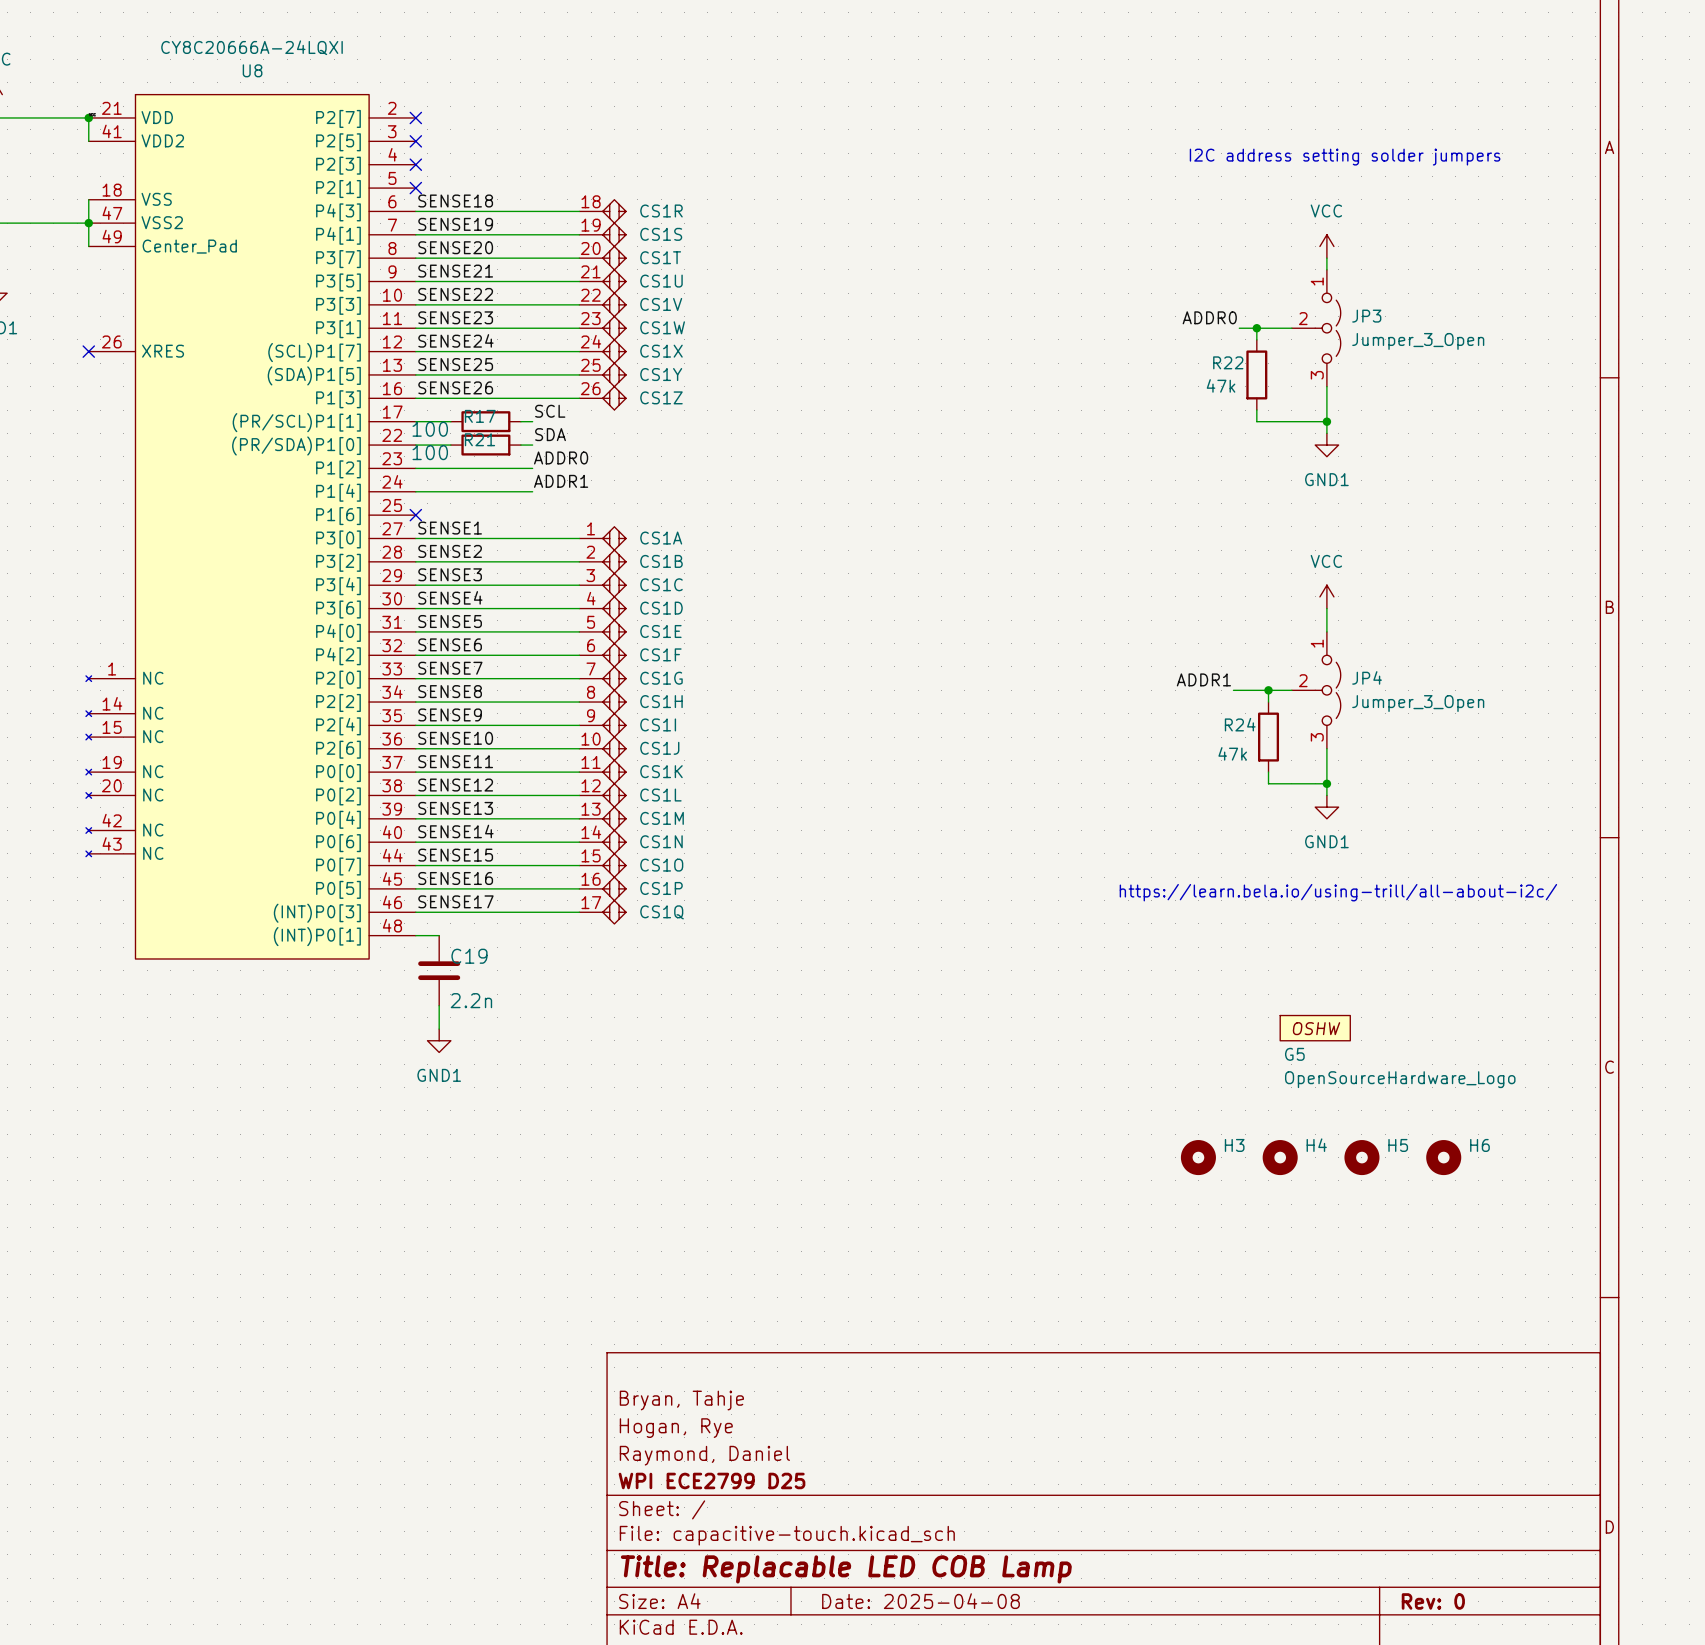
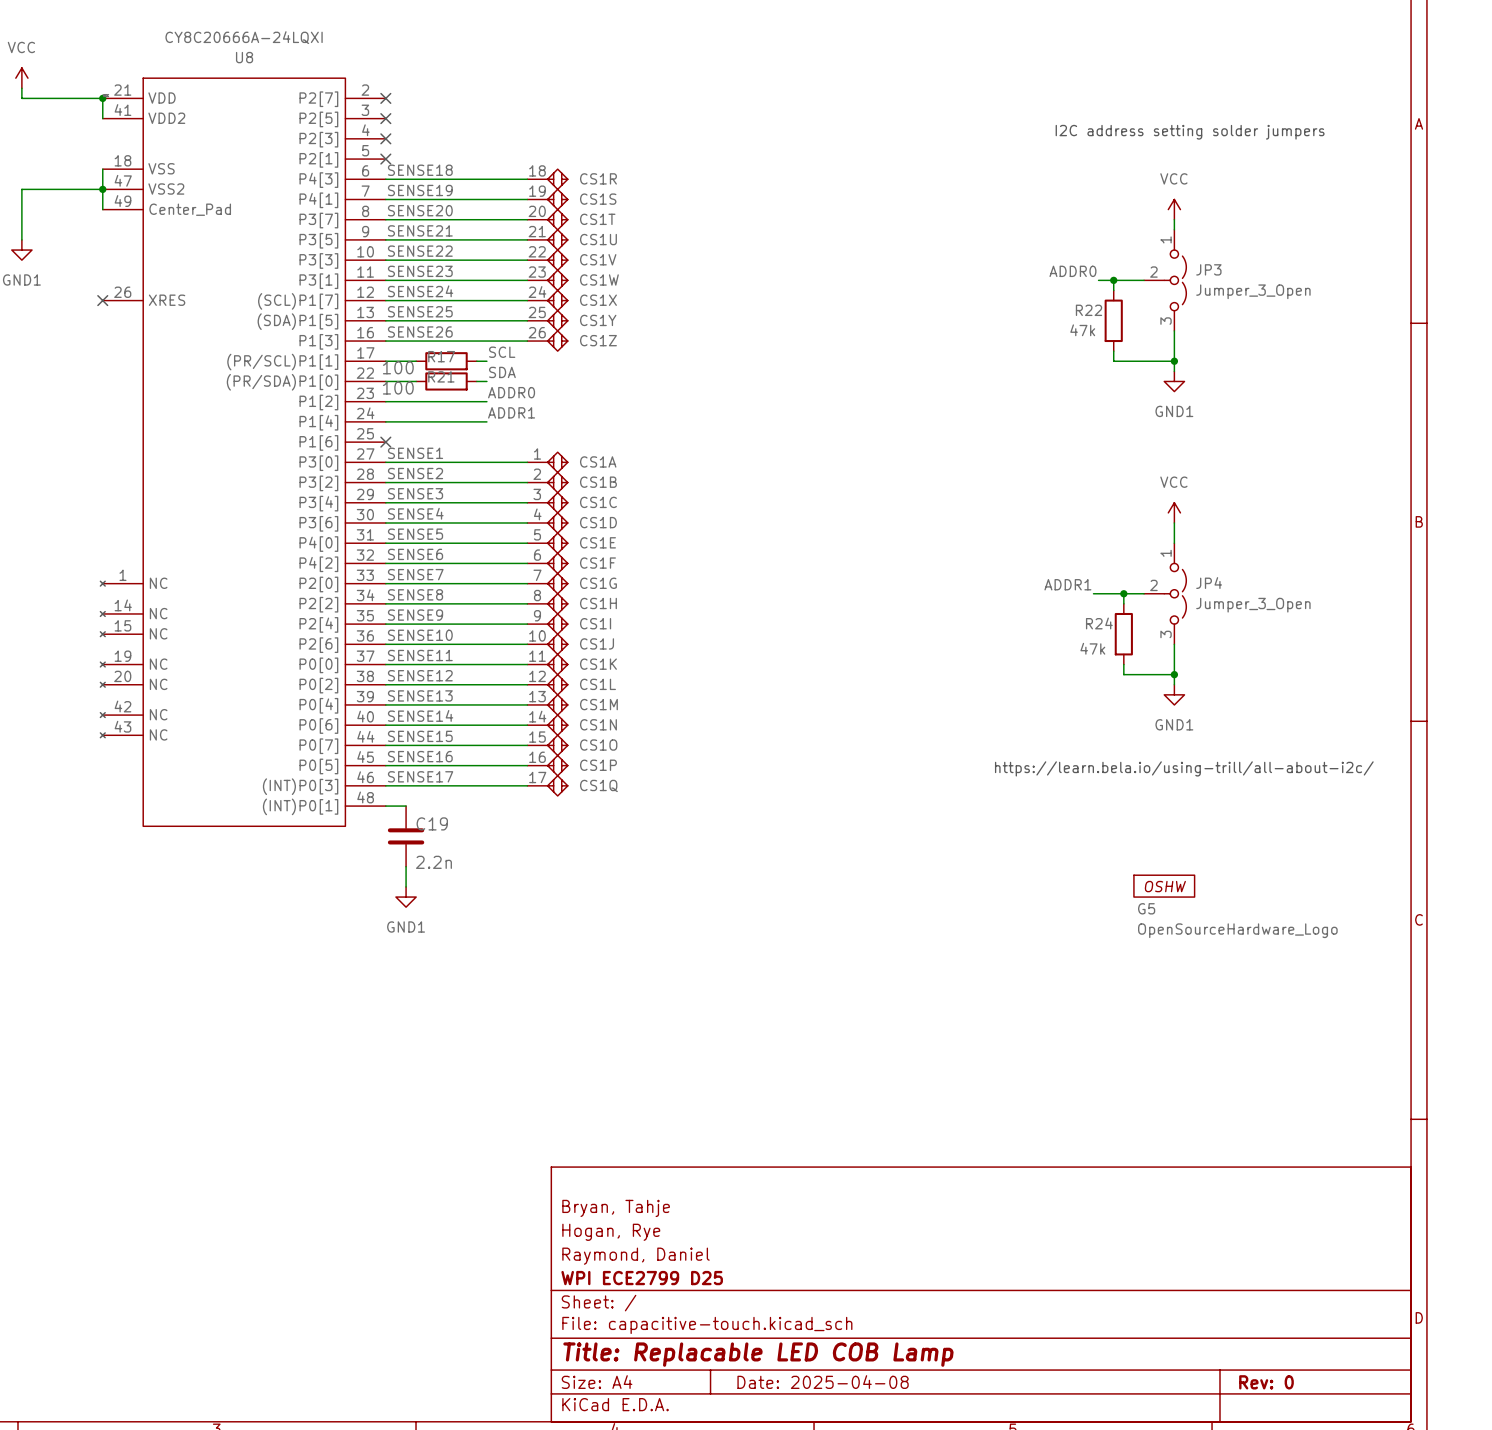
H3: (1198, 1157) -> none
H4: (1280, 1157) -> none
H5: (1361, 1157) -> none
H6: (1443, 1157) -> none

